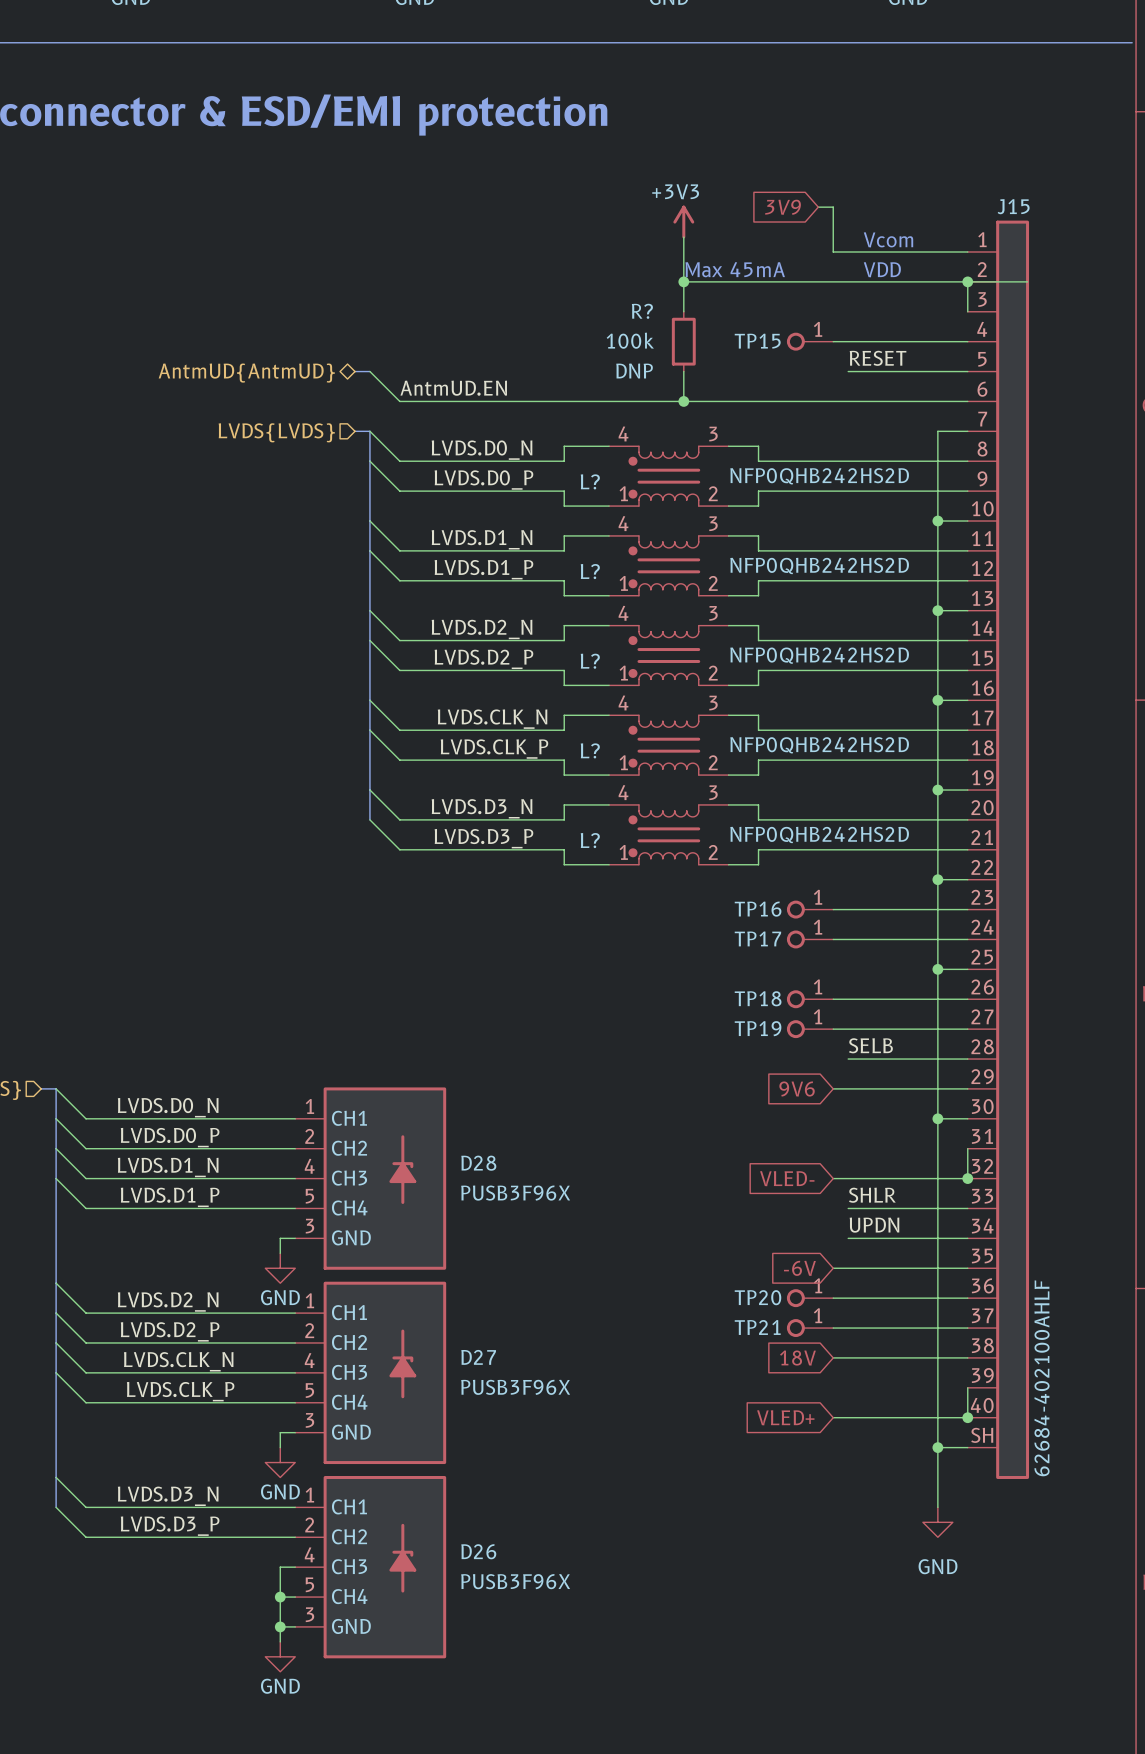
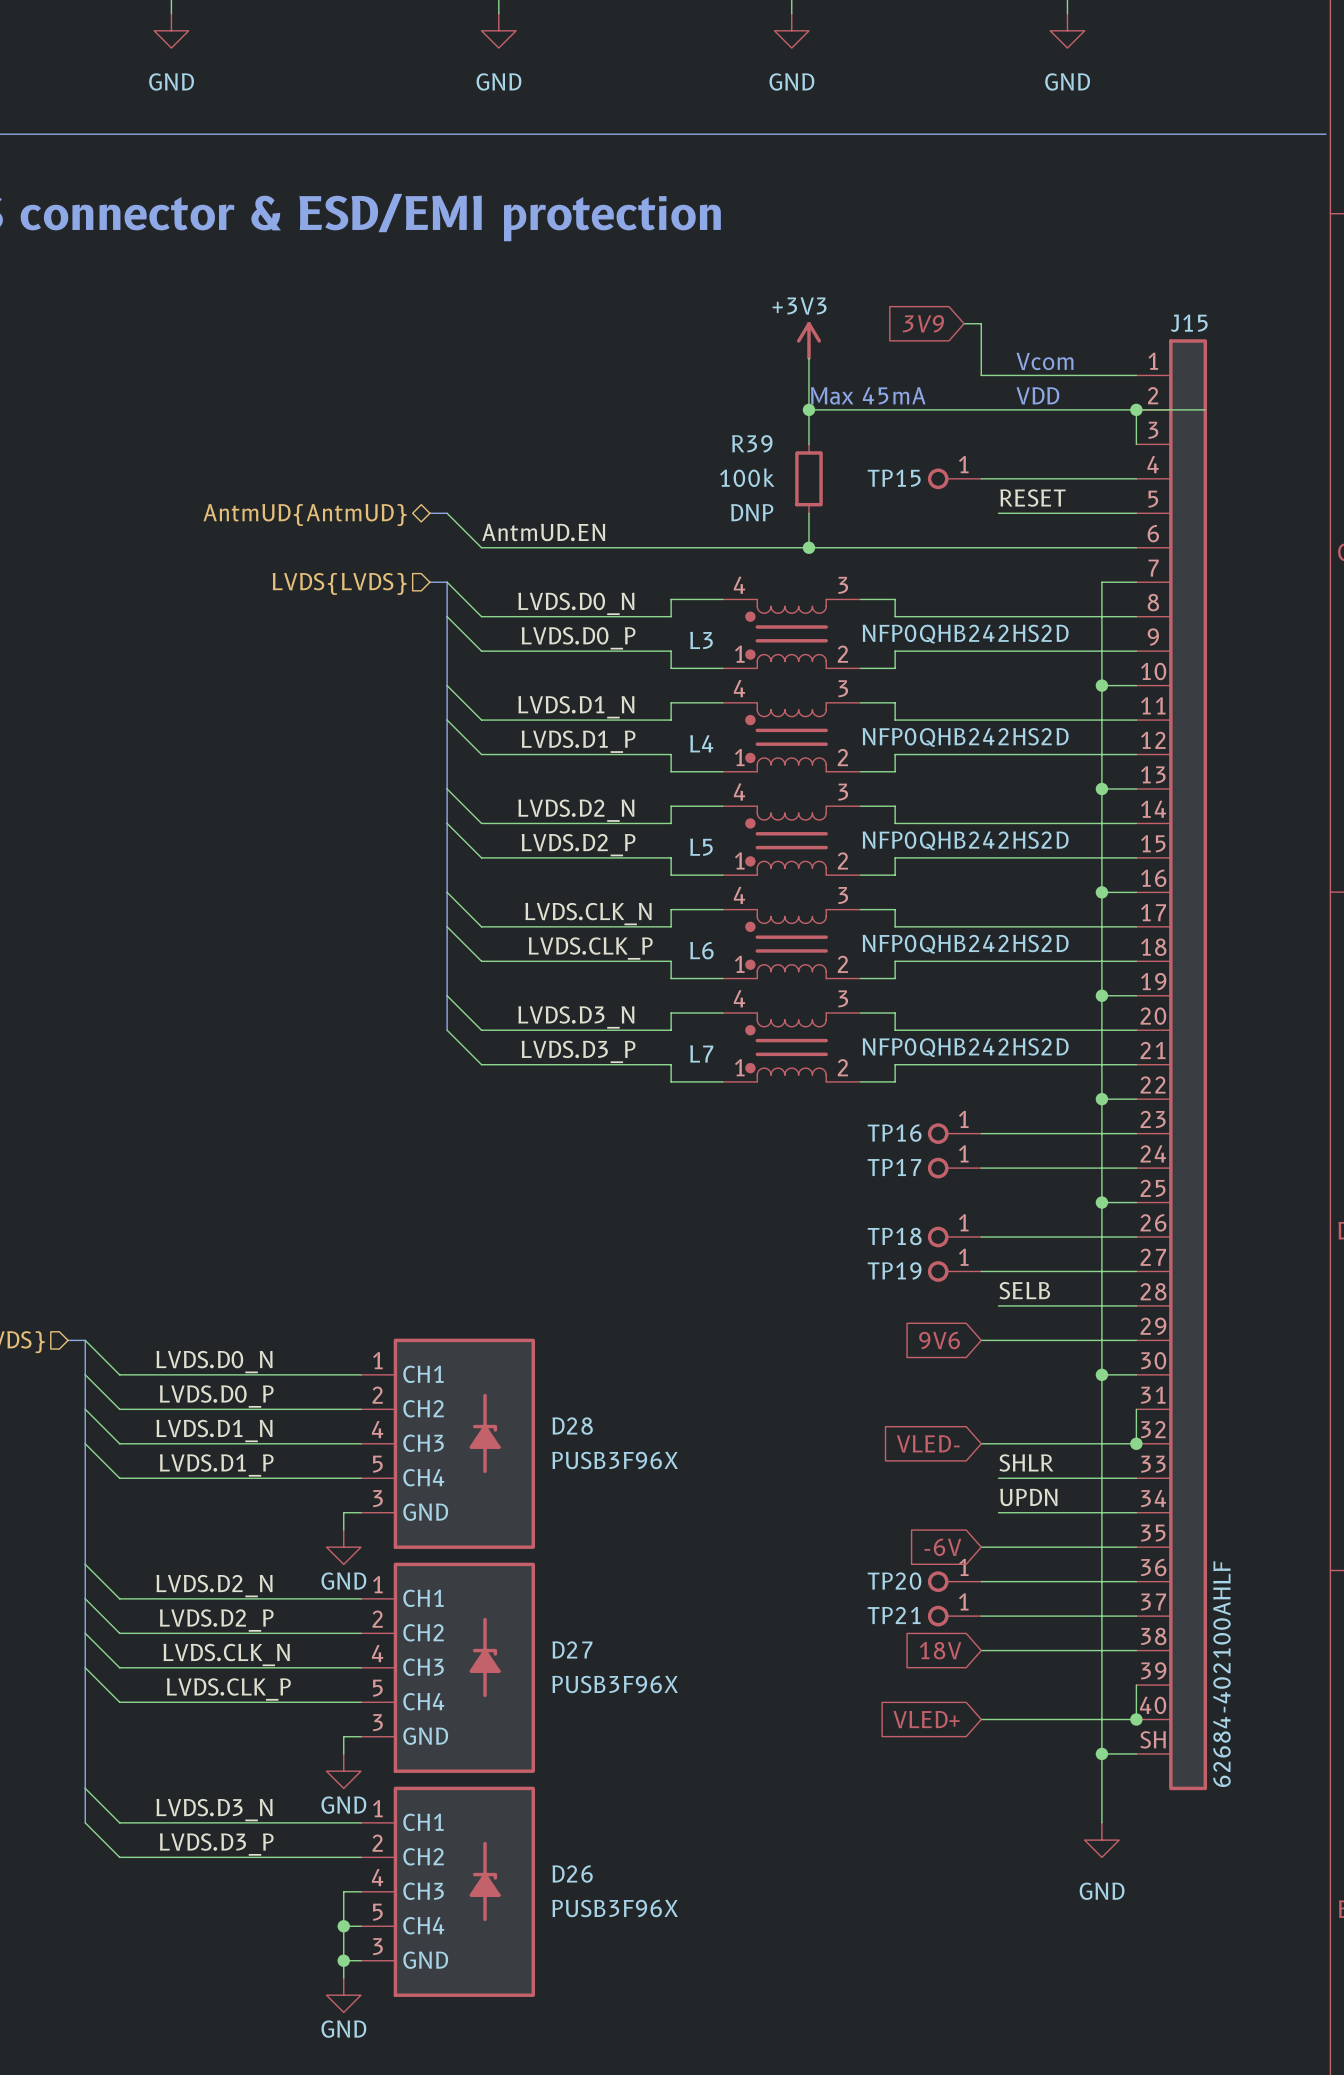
R? name: R? (642, 311) -> R39 (752, 443)
L? name: L? (590, 481) -> L3 (701, 640)
L? name: L? (590, 571) -> L4 (701, 743)
L? name: L? (590, 661) -> L5 (701, 847)
L? name: L? (590, 750) -> L6 (701, 950)
L? name: L? (590, 840) -> L7 (701, 1053)

